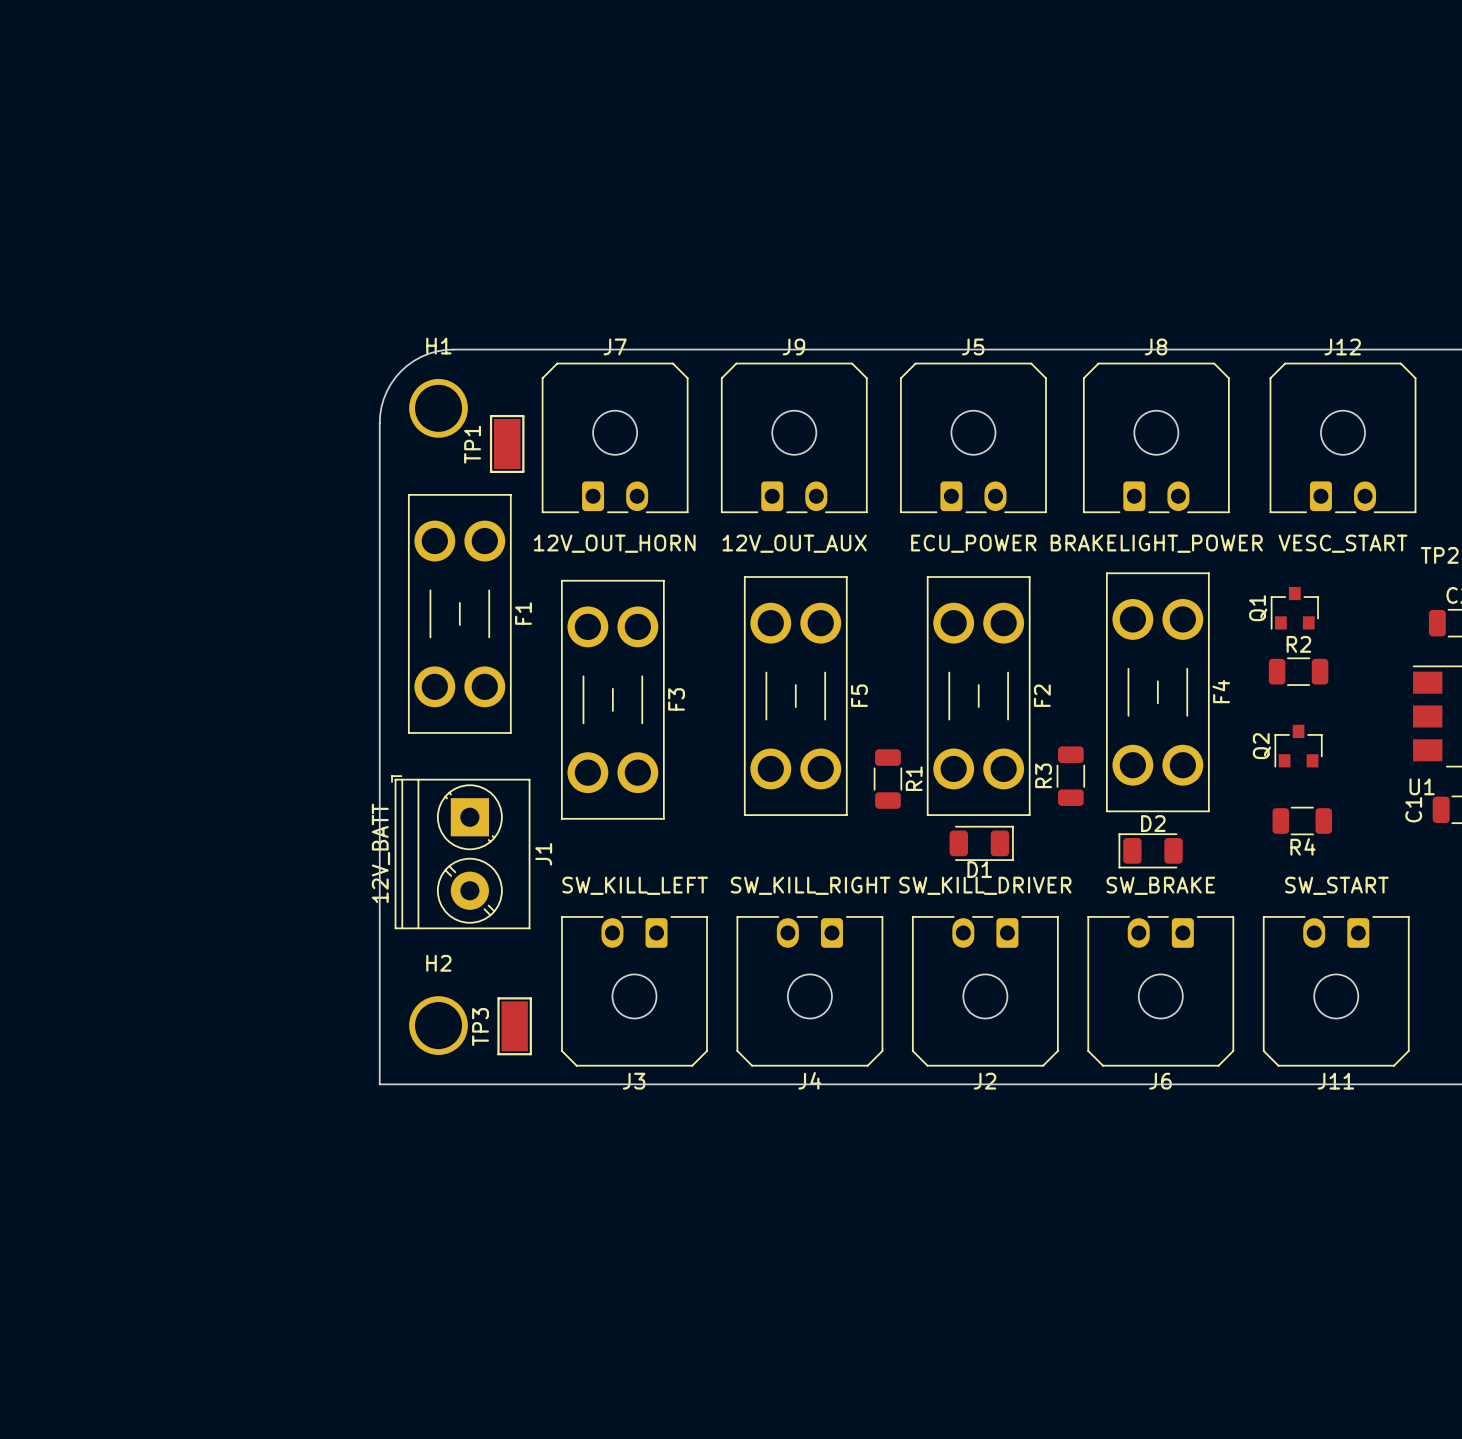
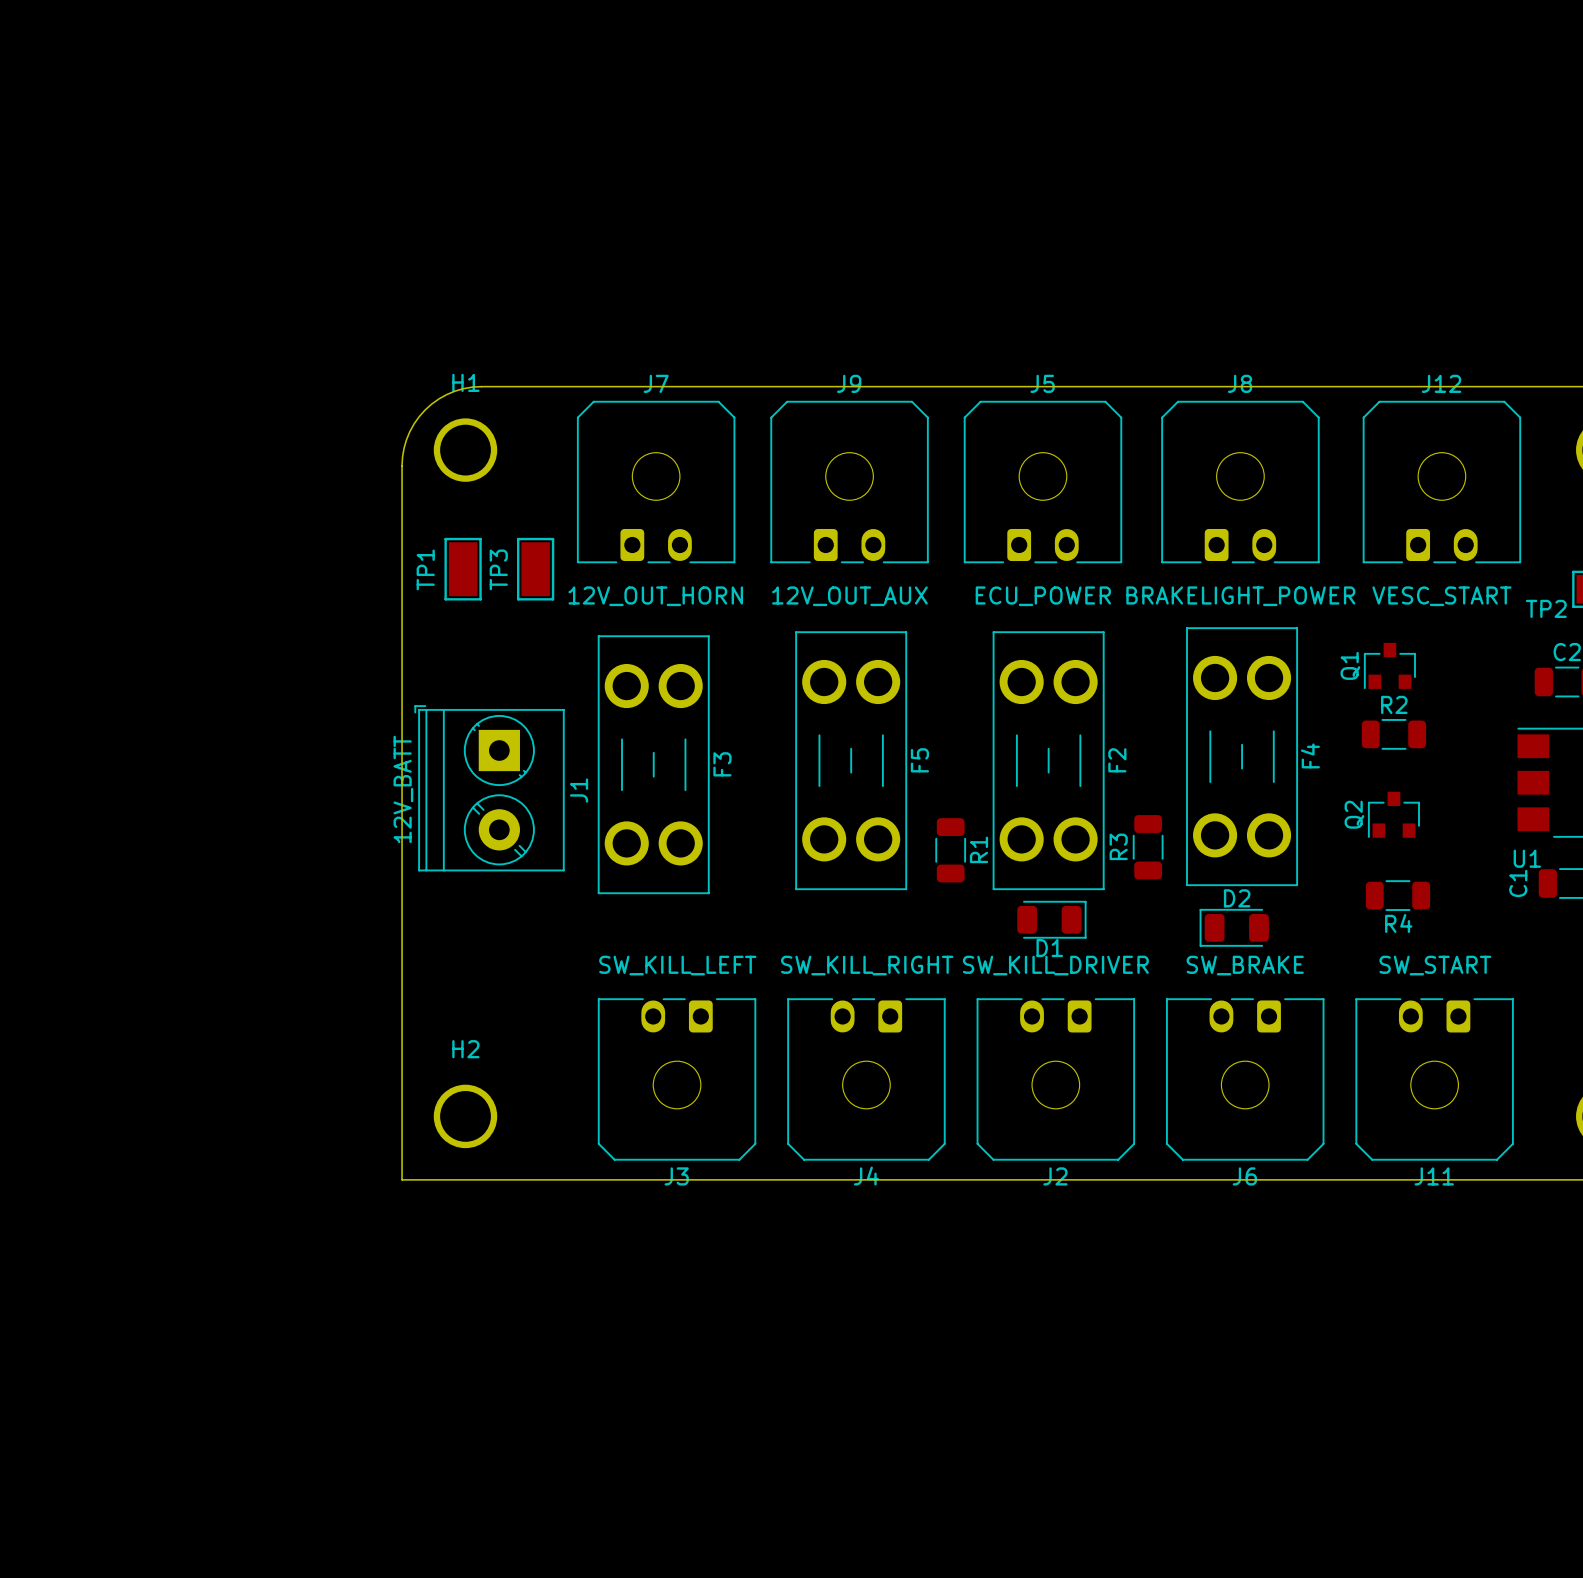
TP1 position: (507, 443) -> (463, 569)
F1: (459, 613) -> none
J1 position: (460, 852) -> (489, 788)
TP3 position: (514, 1026) -> (535, 569)

